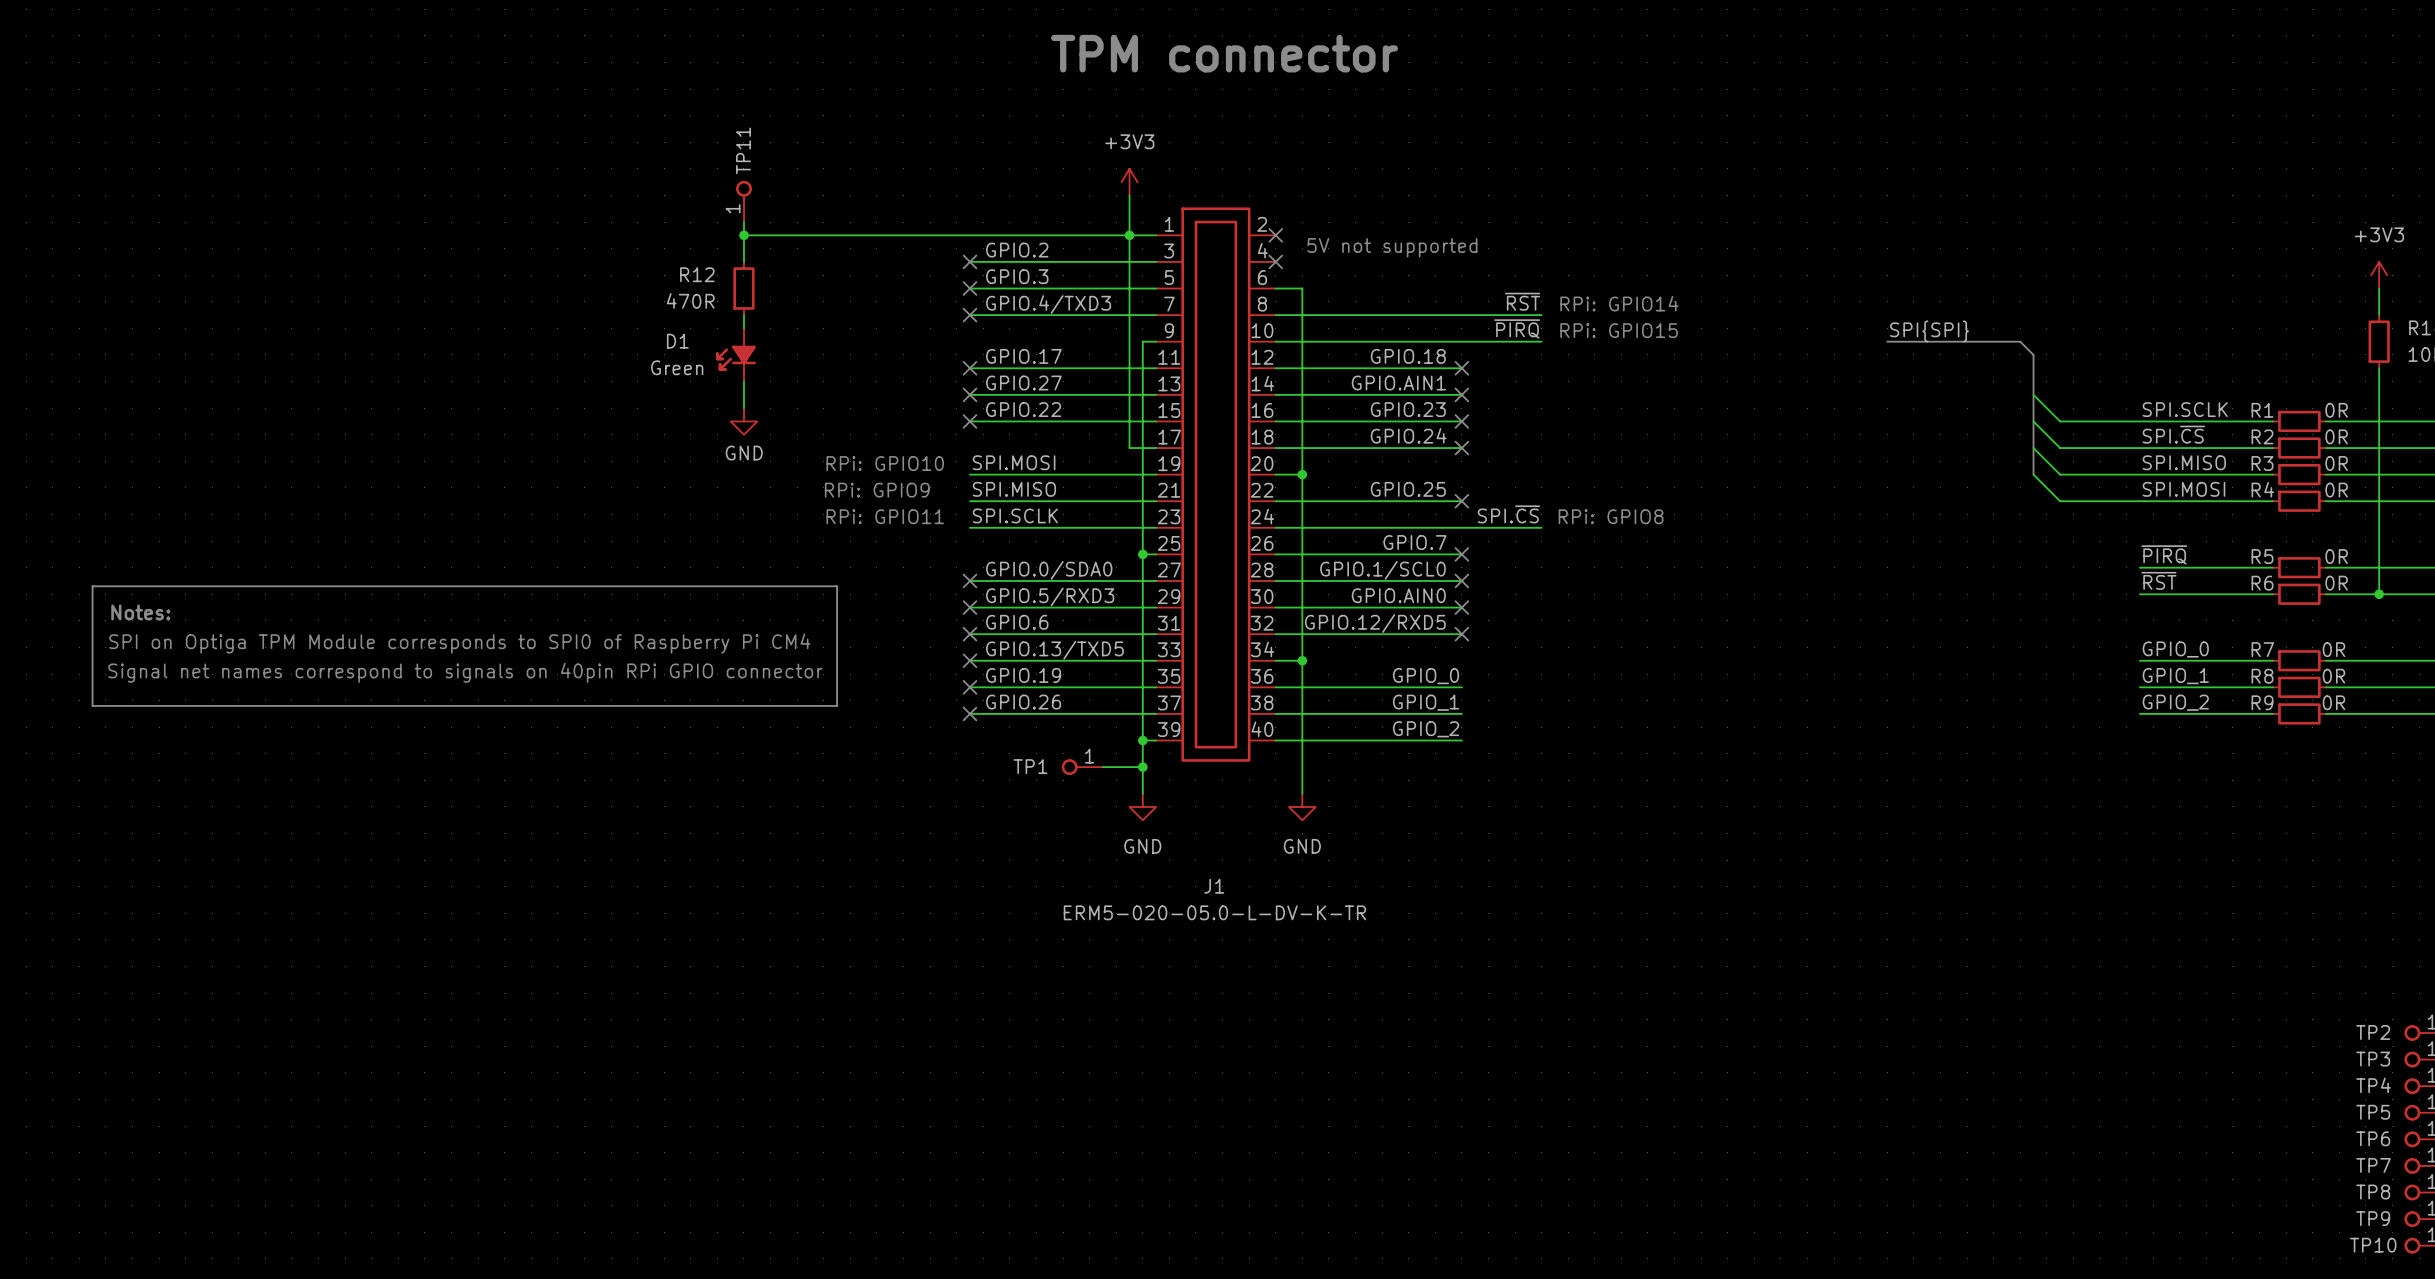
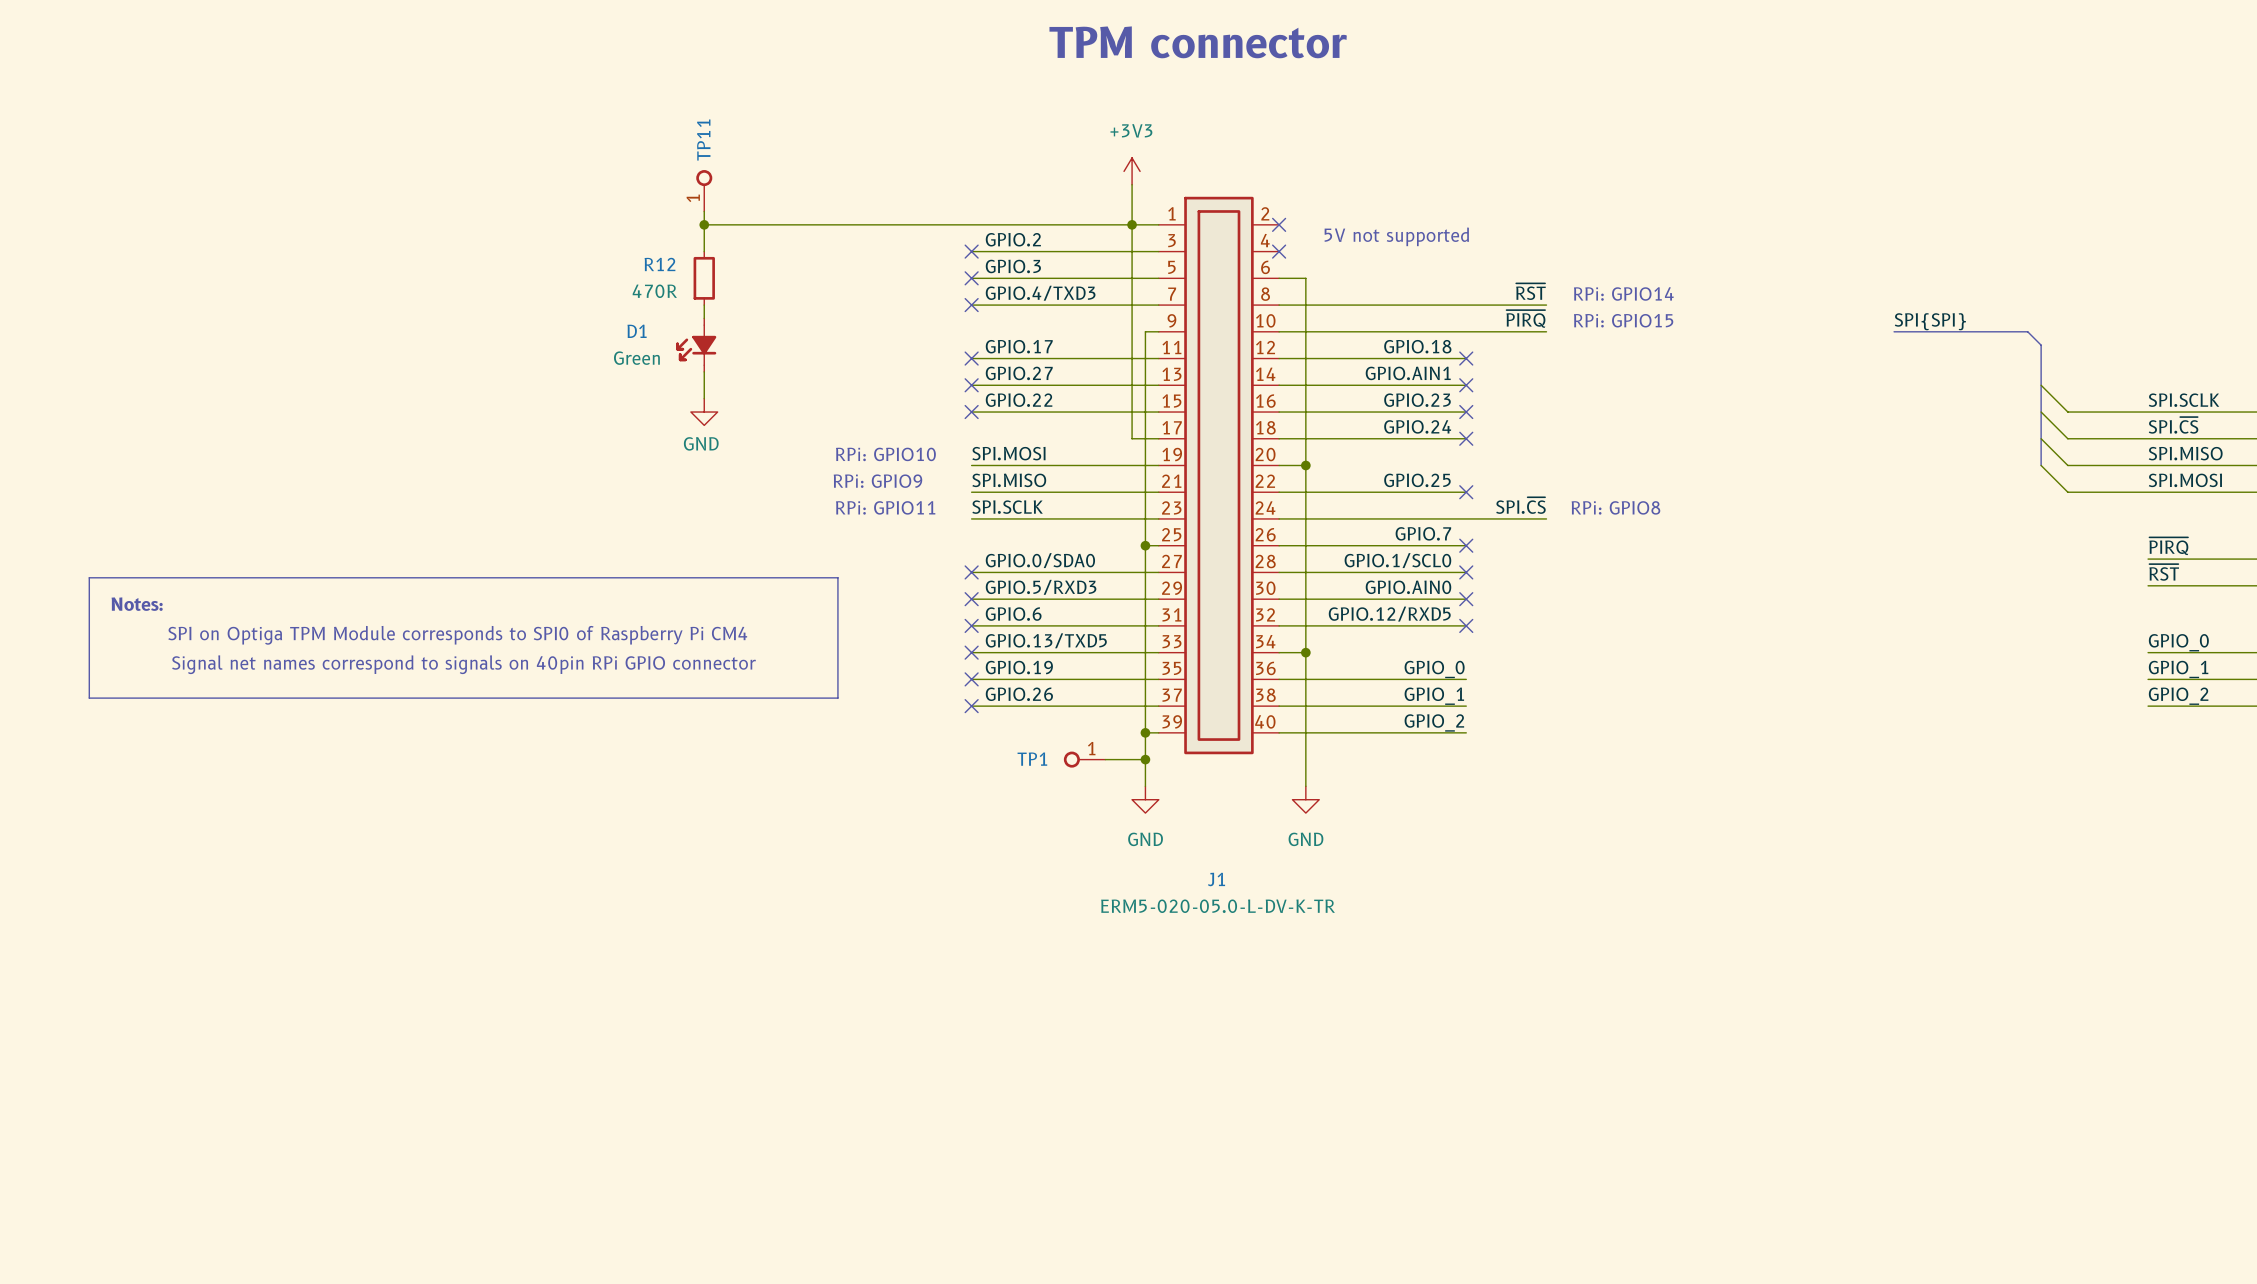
TP11 position: (743, 201) -> (704, 190)
wire: (743, 222) (743, 261) -> (704, 211) (704, 251)
wire: none -> (704, 224) (744, 224)
junction position: (743, 235) -> (704, 224)
R12 position: (743, 288) -> (704, 278)
wire: (743, 315) (743, 328) -> (704, 305) (704, 318)
D1 position: (736, 354) -> (696, 345)
wire: (743, 381) (743, 408) -> (704, 371) (704, 398)
power symbol position: GND (743, 421) -> GND (704, 412)

